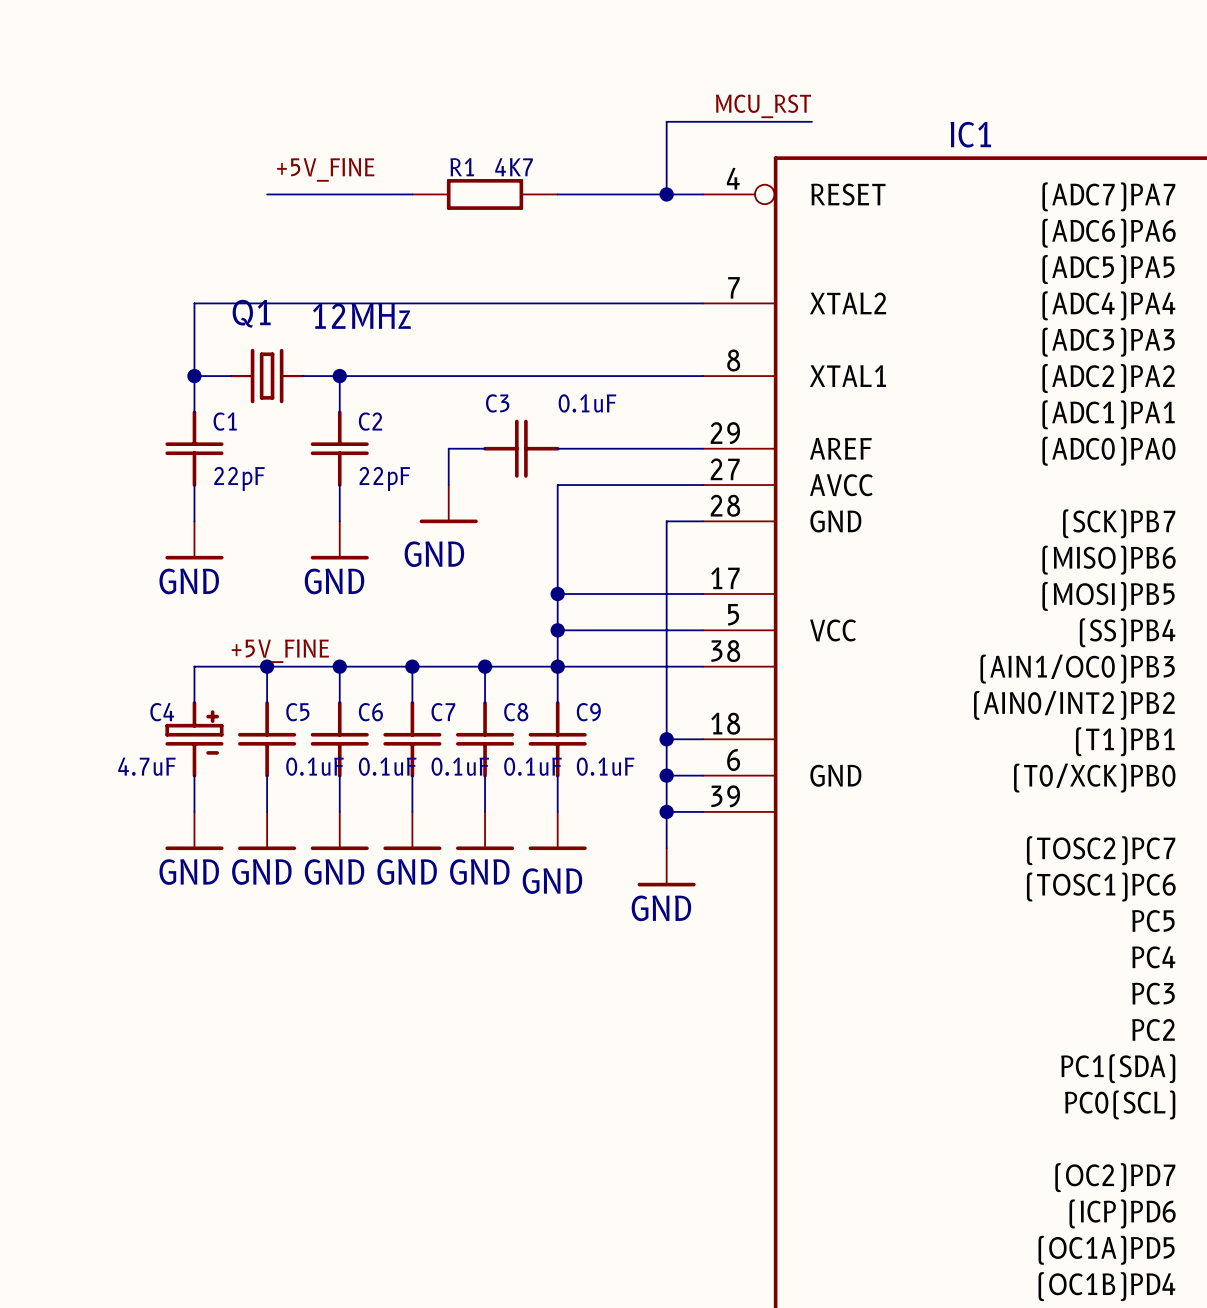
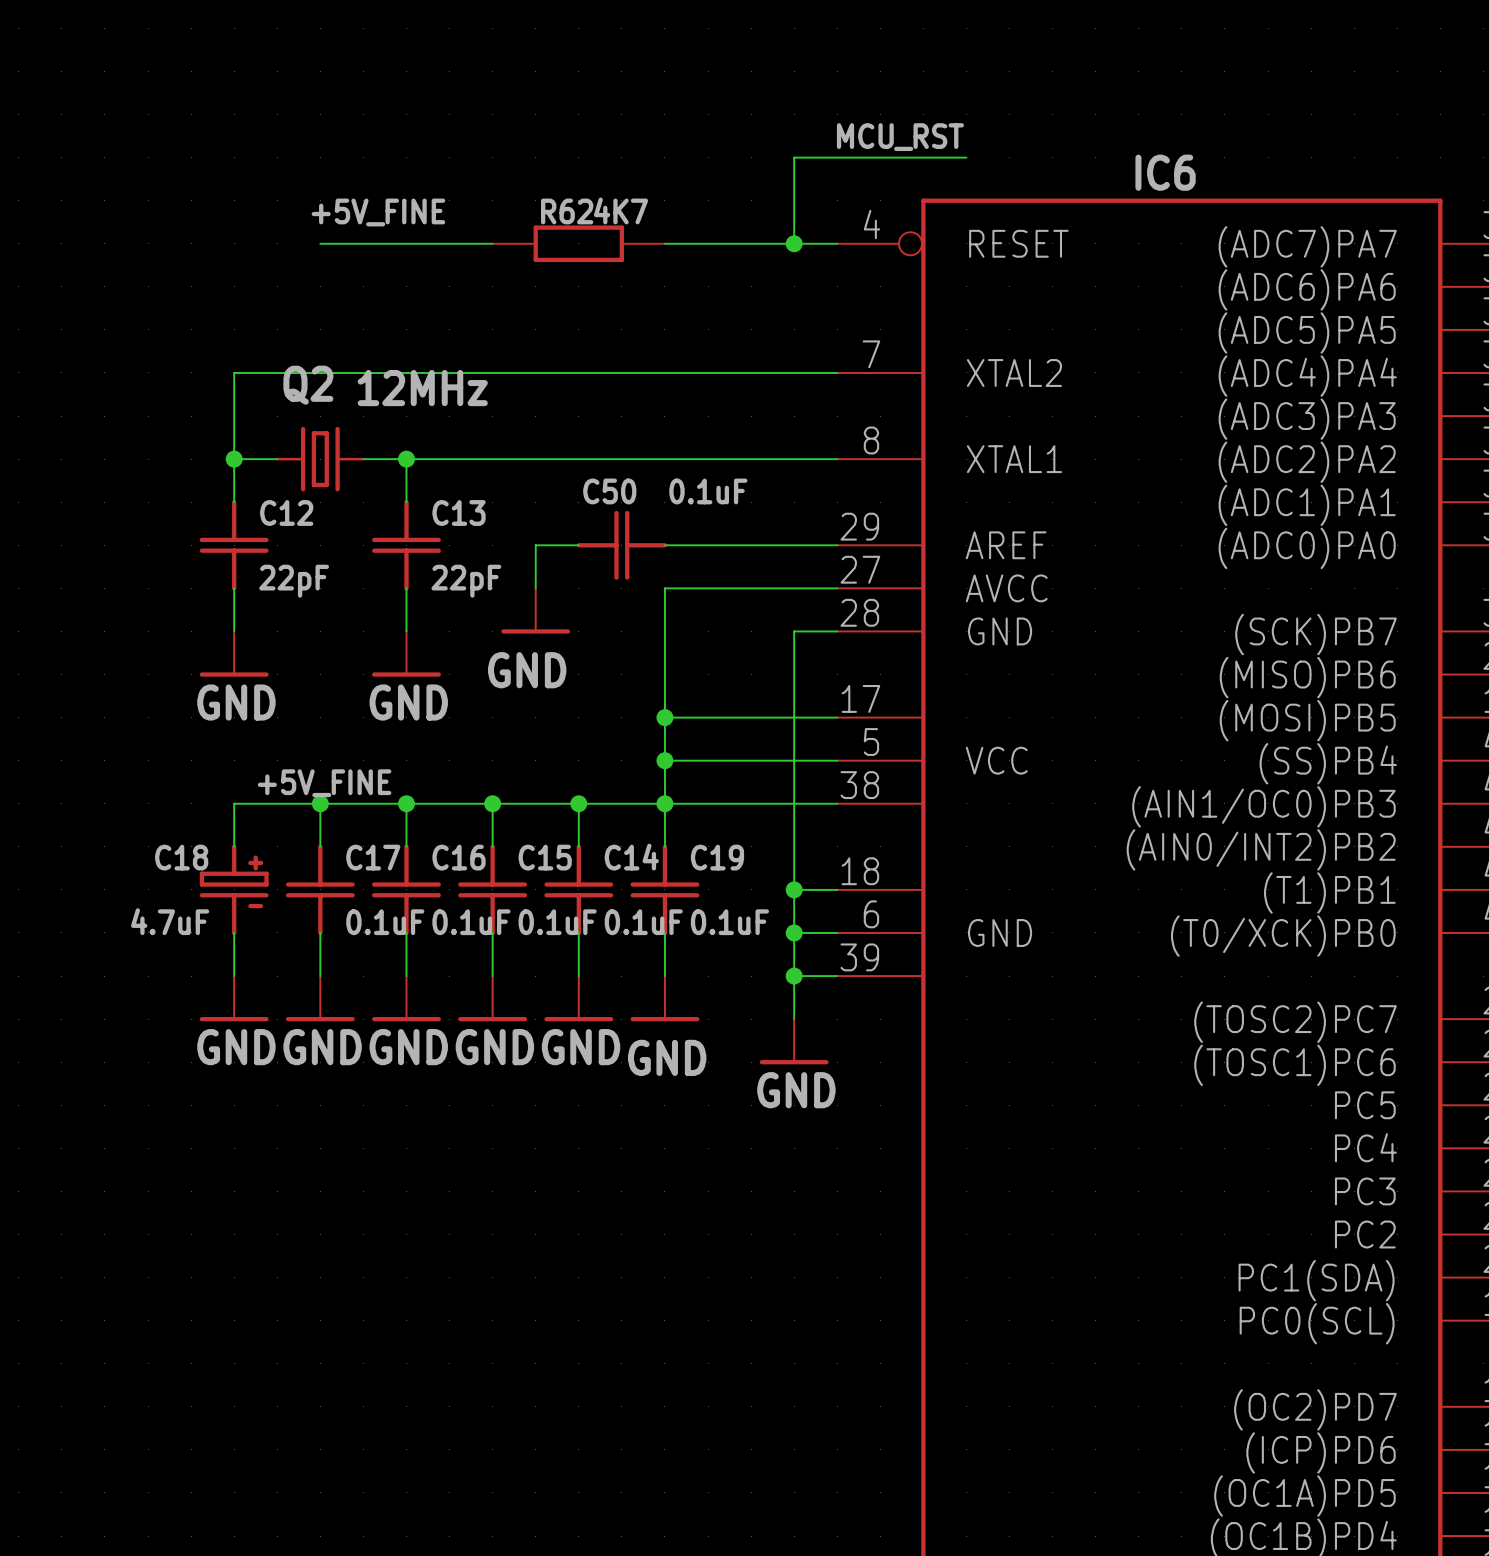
IC1 name: IC1 (970, 134) -> IC6 (1165, 172)
R1 name: R1 (462, 167) -> R62 (567, 211)
Q1 name: Q1 (251, 313) -> Q2 (308, 385)
C3 name: C3 (497, 403) -> C50 (609, 491)
C1 name: C1 (225, 421) -> C12 (286, 512)
C2 name: C2 (370, 421) -> C13 (459, 512)
C4 name: C4 (162, 712) -> C18 (181, 857)
C5 name: C5 (297, 712) -> C17 (373, 857)
C6 name: C6 (370, 712) -> C16 (459, 857)
C7 name: C7 (443, 712) -> C15 (545, 857)
C8 name: C8 (516, 712) -> C14 (631, 857)
C9 name: C9 (588, 712) -> C19 (717, 857)

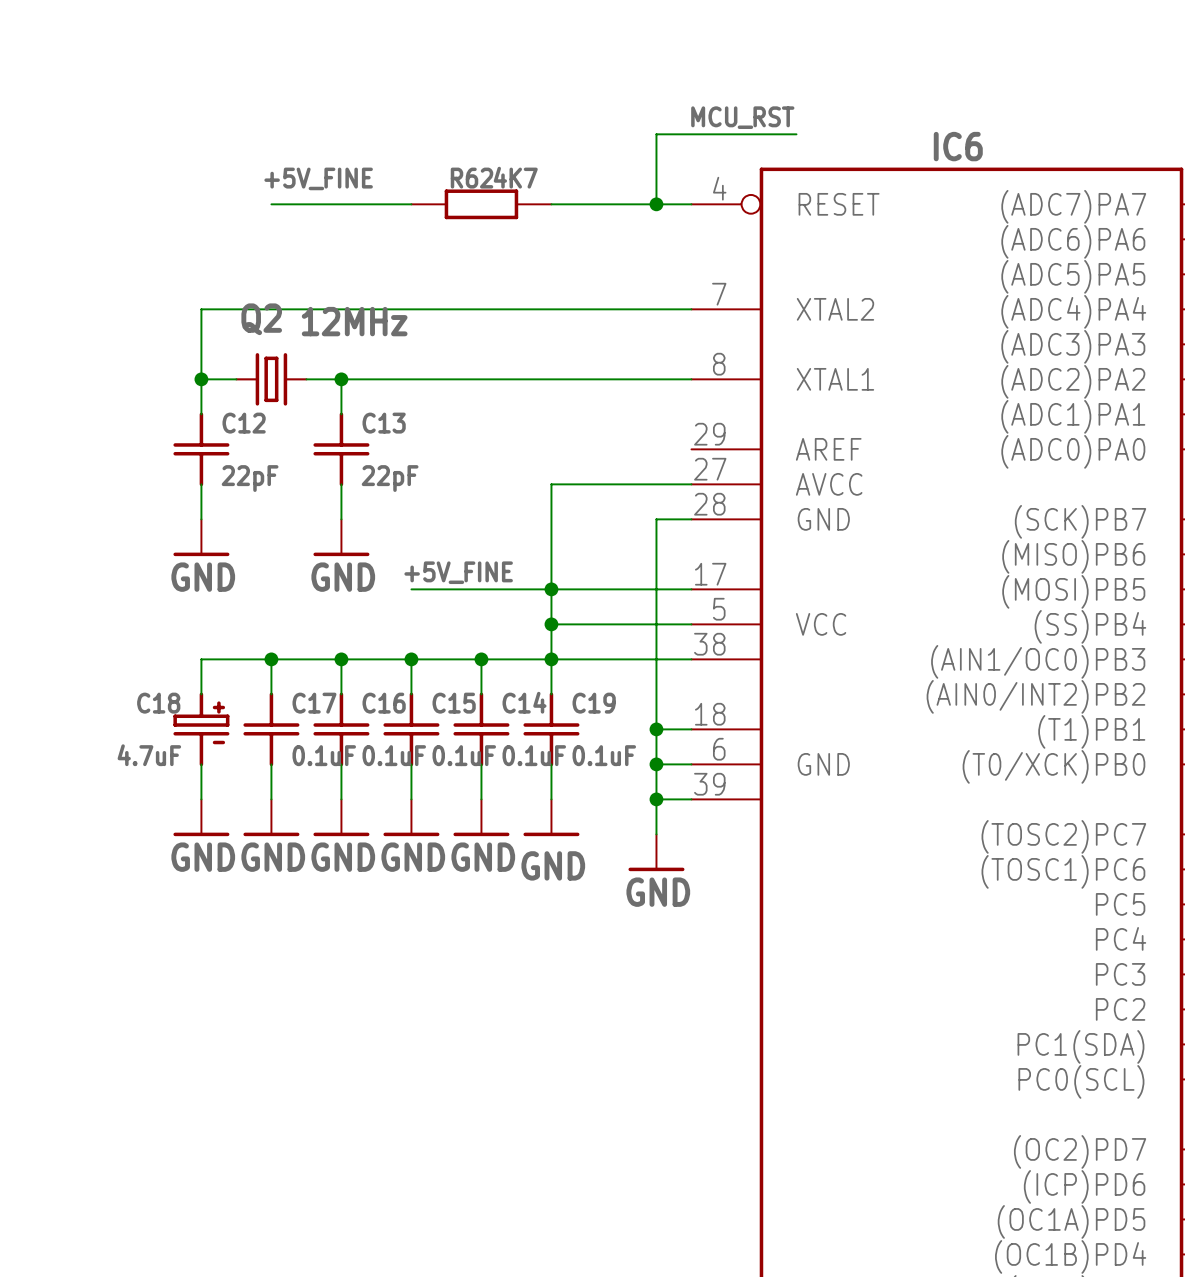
wire: (578, 545) (535, 545) (535, 588) -> none
C50: 0.1uF (621, 545) -> none
wire: (664, 545) (837, 545) -> (411, 589) (551, 589)
power symbol: GND (535, 610) -> none
label position: +5V_FINE (324, 783) -> +5V_FINE (458, 572)

